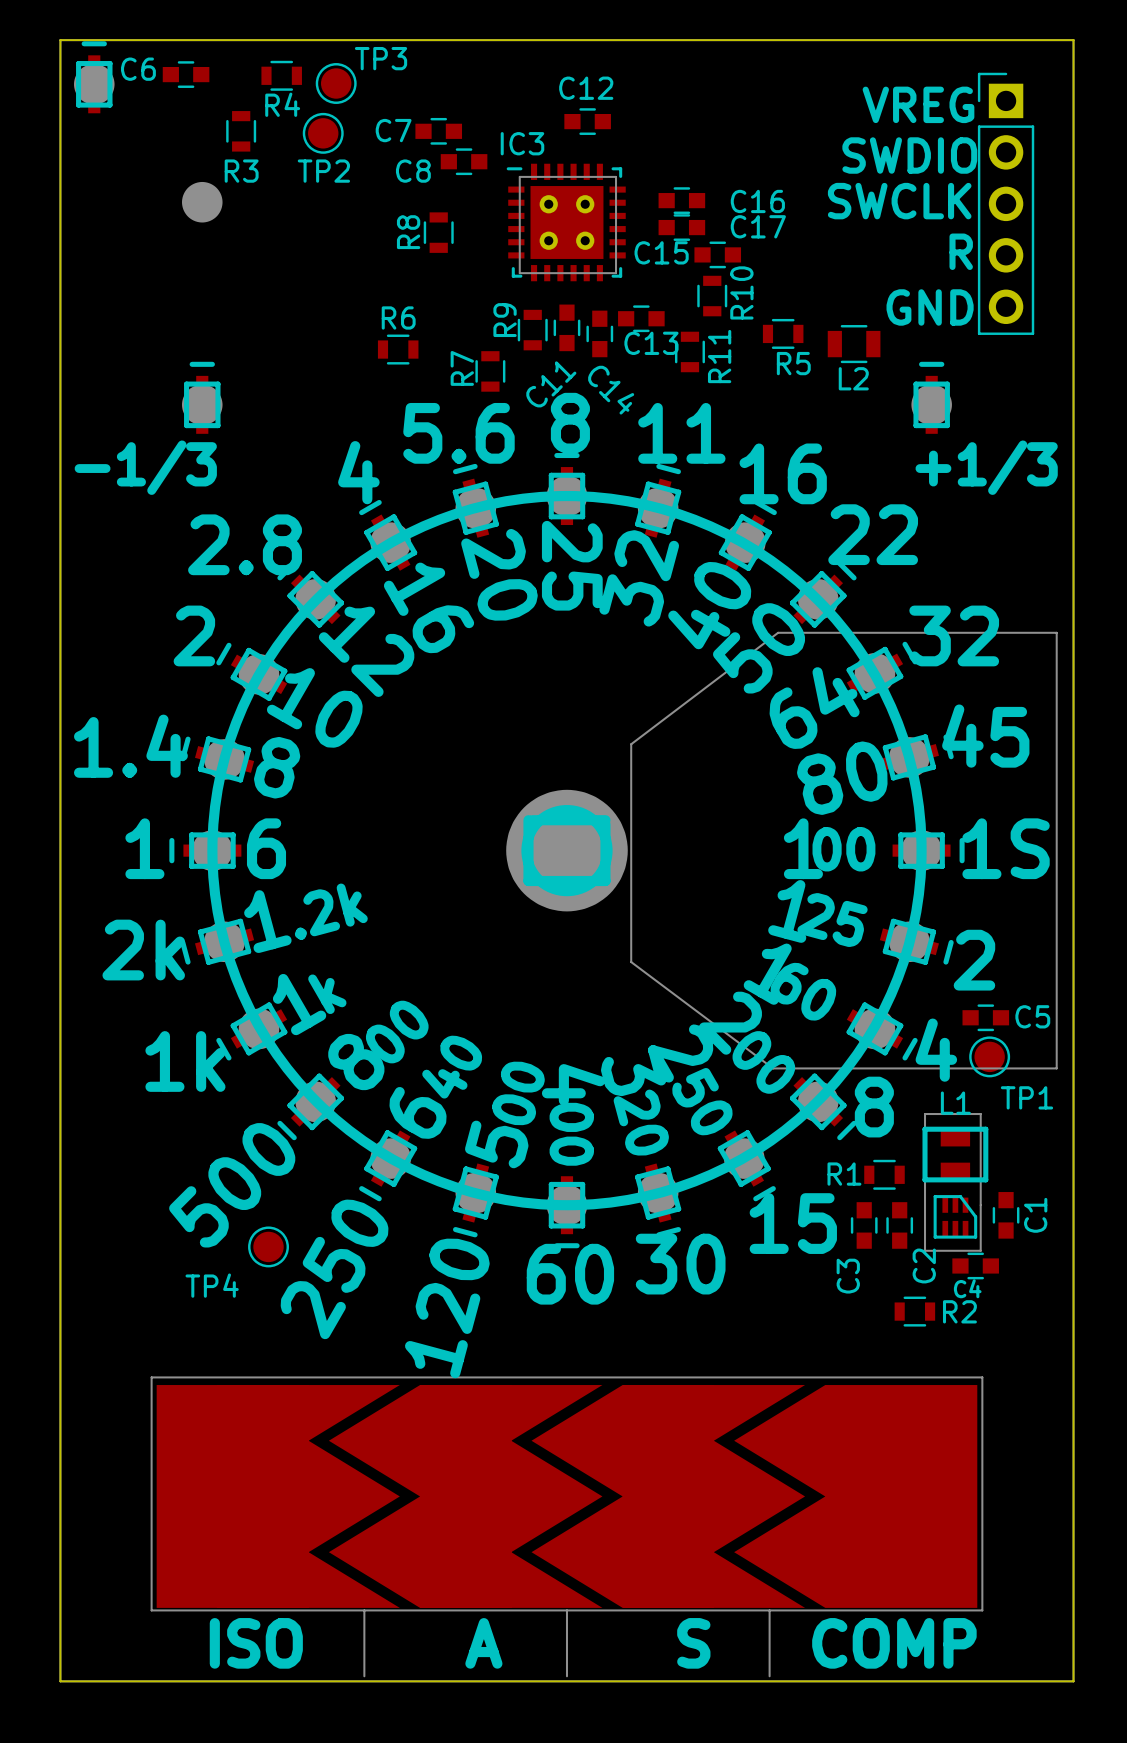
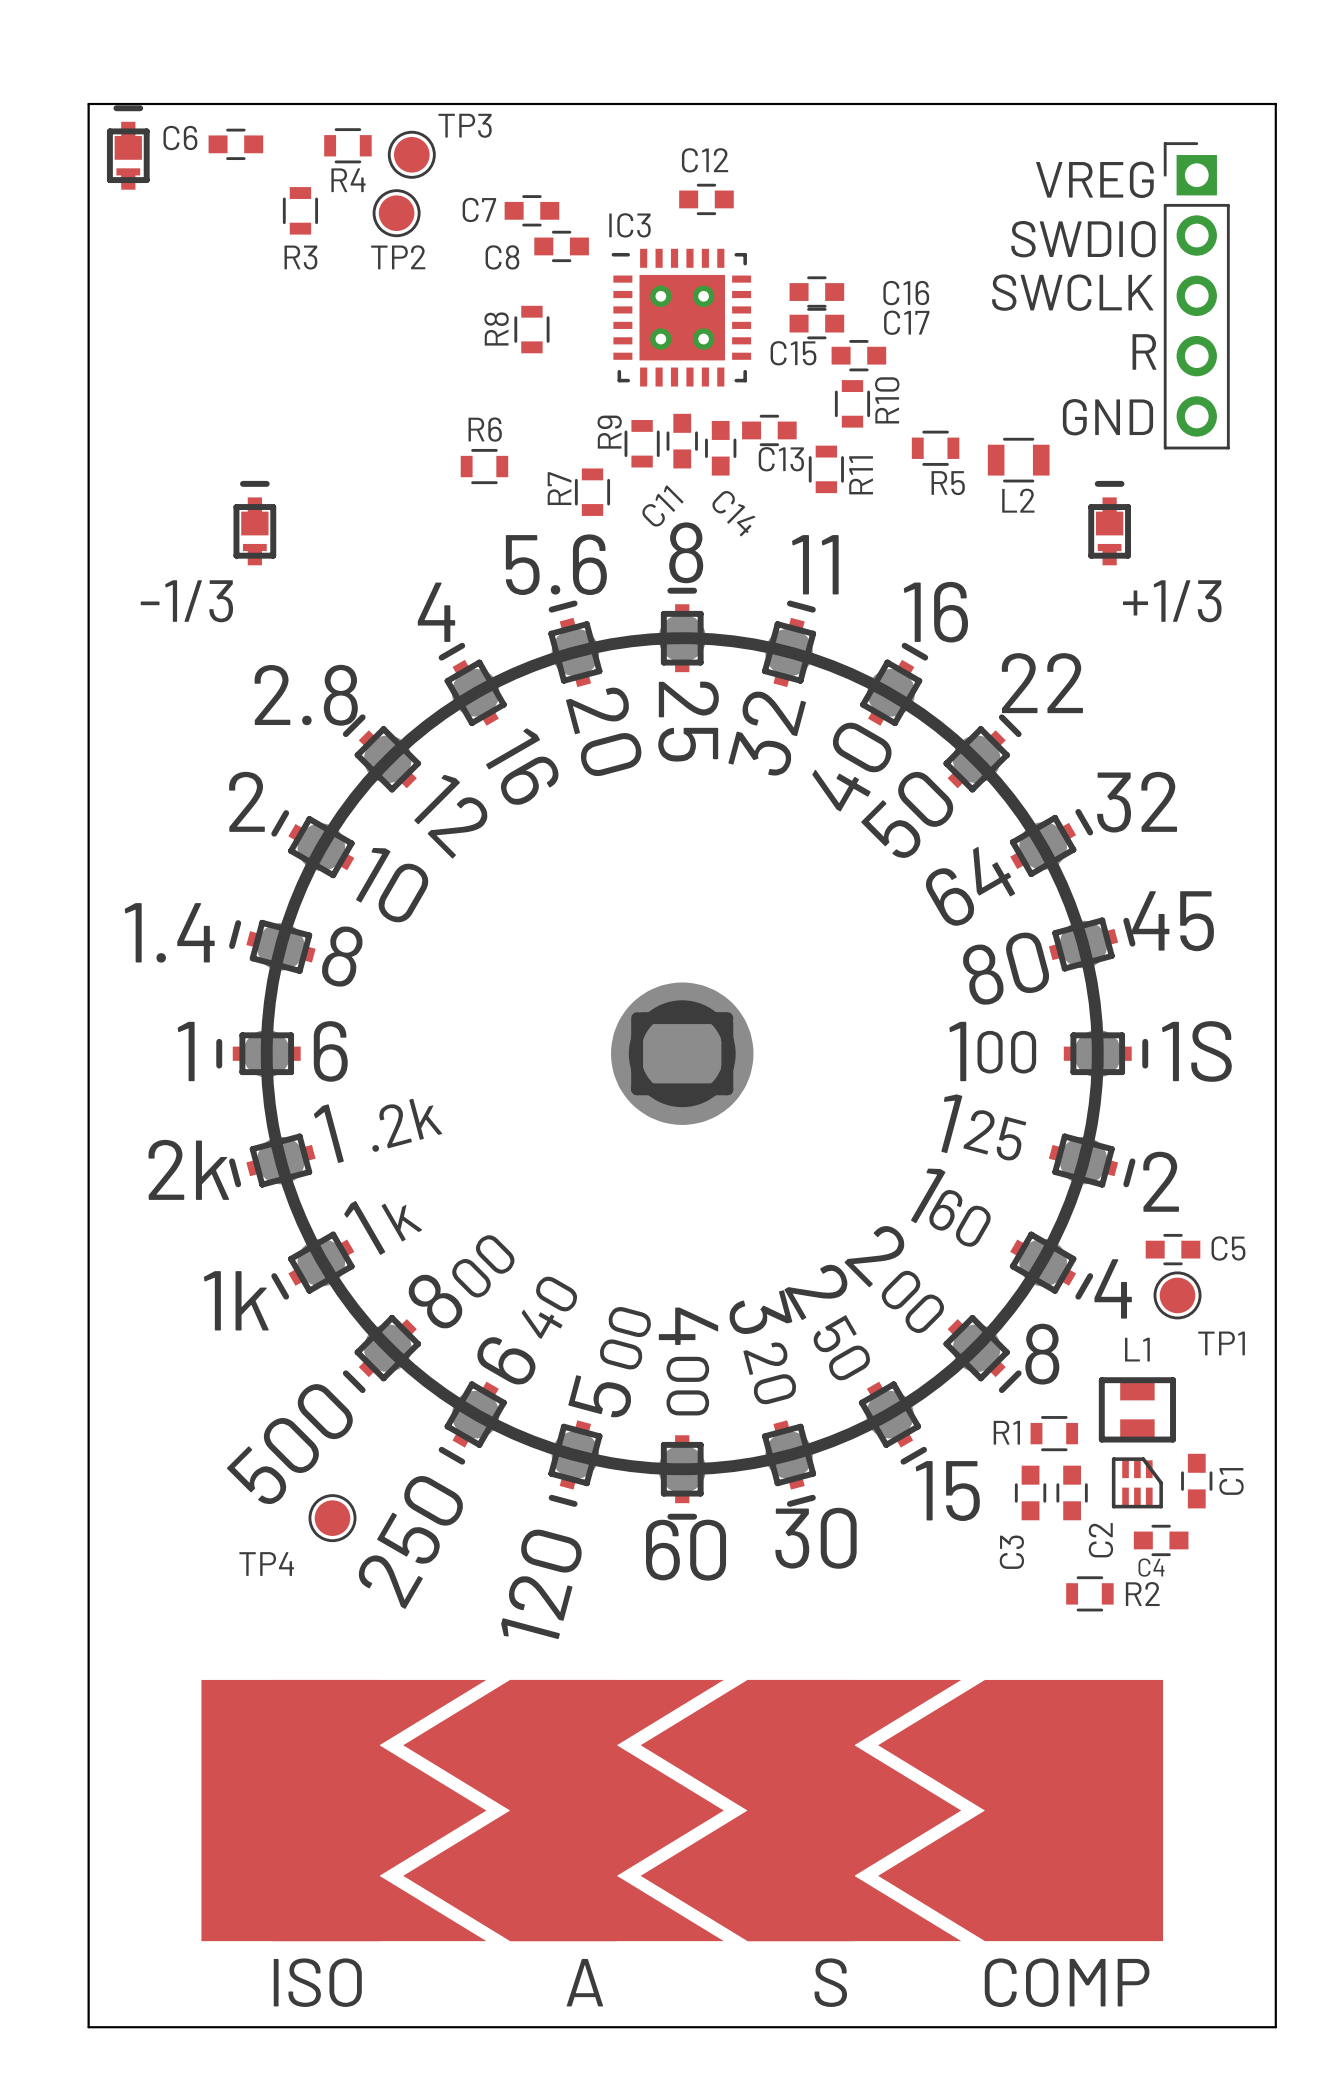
drawing: [74, 64, 115, 105] -> none
line: (519, 176) (519, 273) (616, 273) (616, 176) (519, 176) -> none
drawing: [182, 181, 223, 223] -> none
drawing: [182, 384, 223, 426] -> none
drawing: [911, 384, 952, 426] -> none
line: (778, 632) (631, 744) (631, 962) (773, 1068) (1056, 1068) (1056, 632) (778, 632) -> none
line: (925, 1114) (925, 1250) (980, 1250) (980, 1114) (925, 1114) -> none
line: (151, 1377) (151, 1610) (982, 1610) (982, 1377) (151, 1377) -> none
line: (364, 1610) (364, 1676) -> none
line: (566, 1610) (566, 1676) -> none
line: (769, 1610) (769, 1676) -> none

